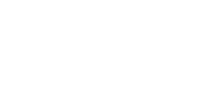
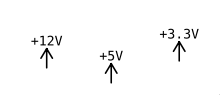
power symbol: none -> +3.3V (179, 51)
power symbol: none -> +12V (46, 58)
power symbol: none -> +5V (111, 73)

